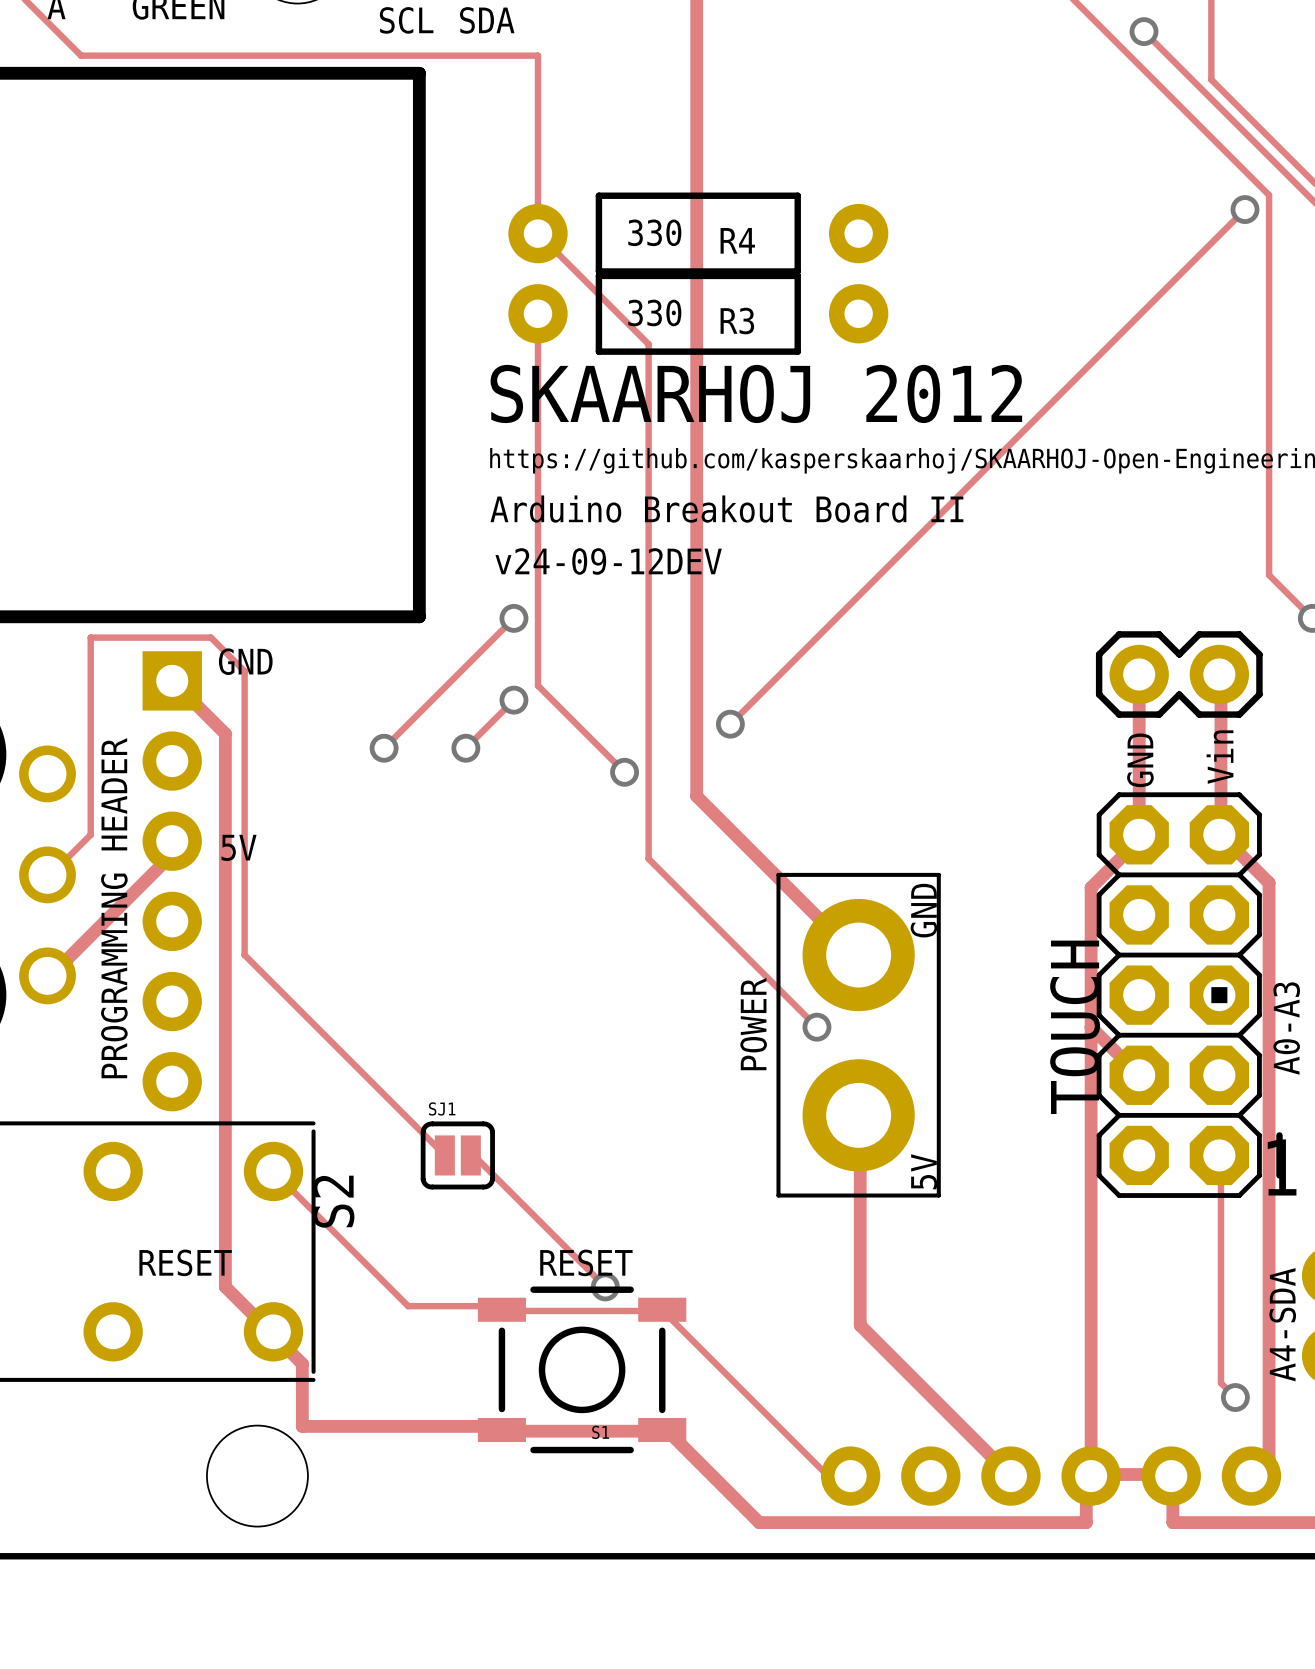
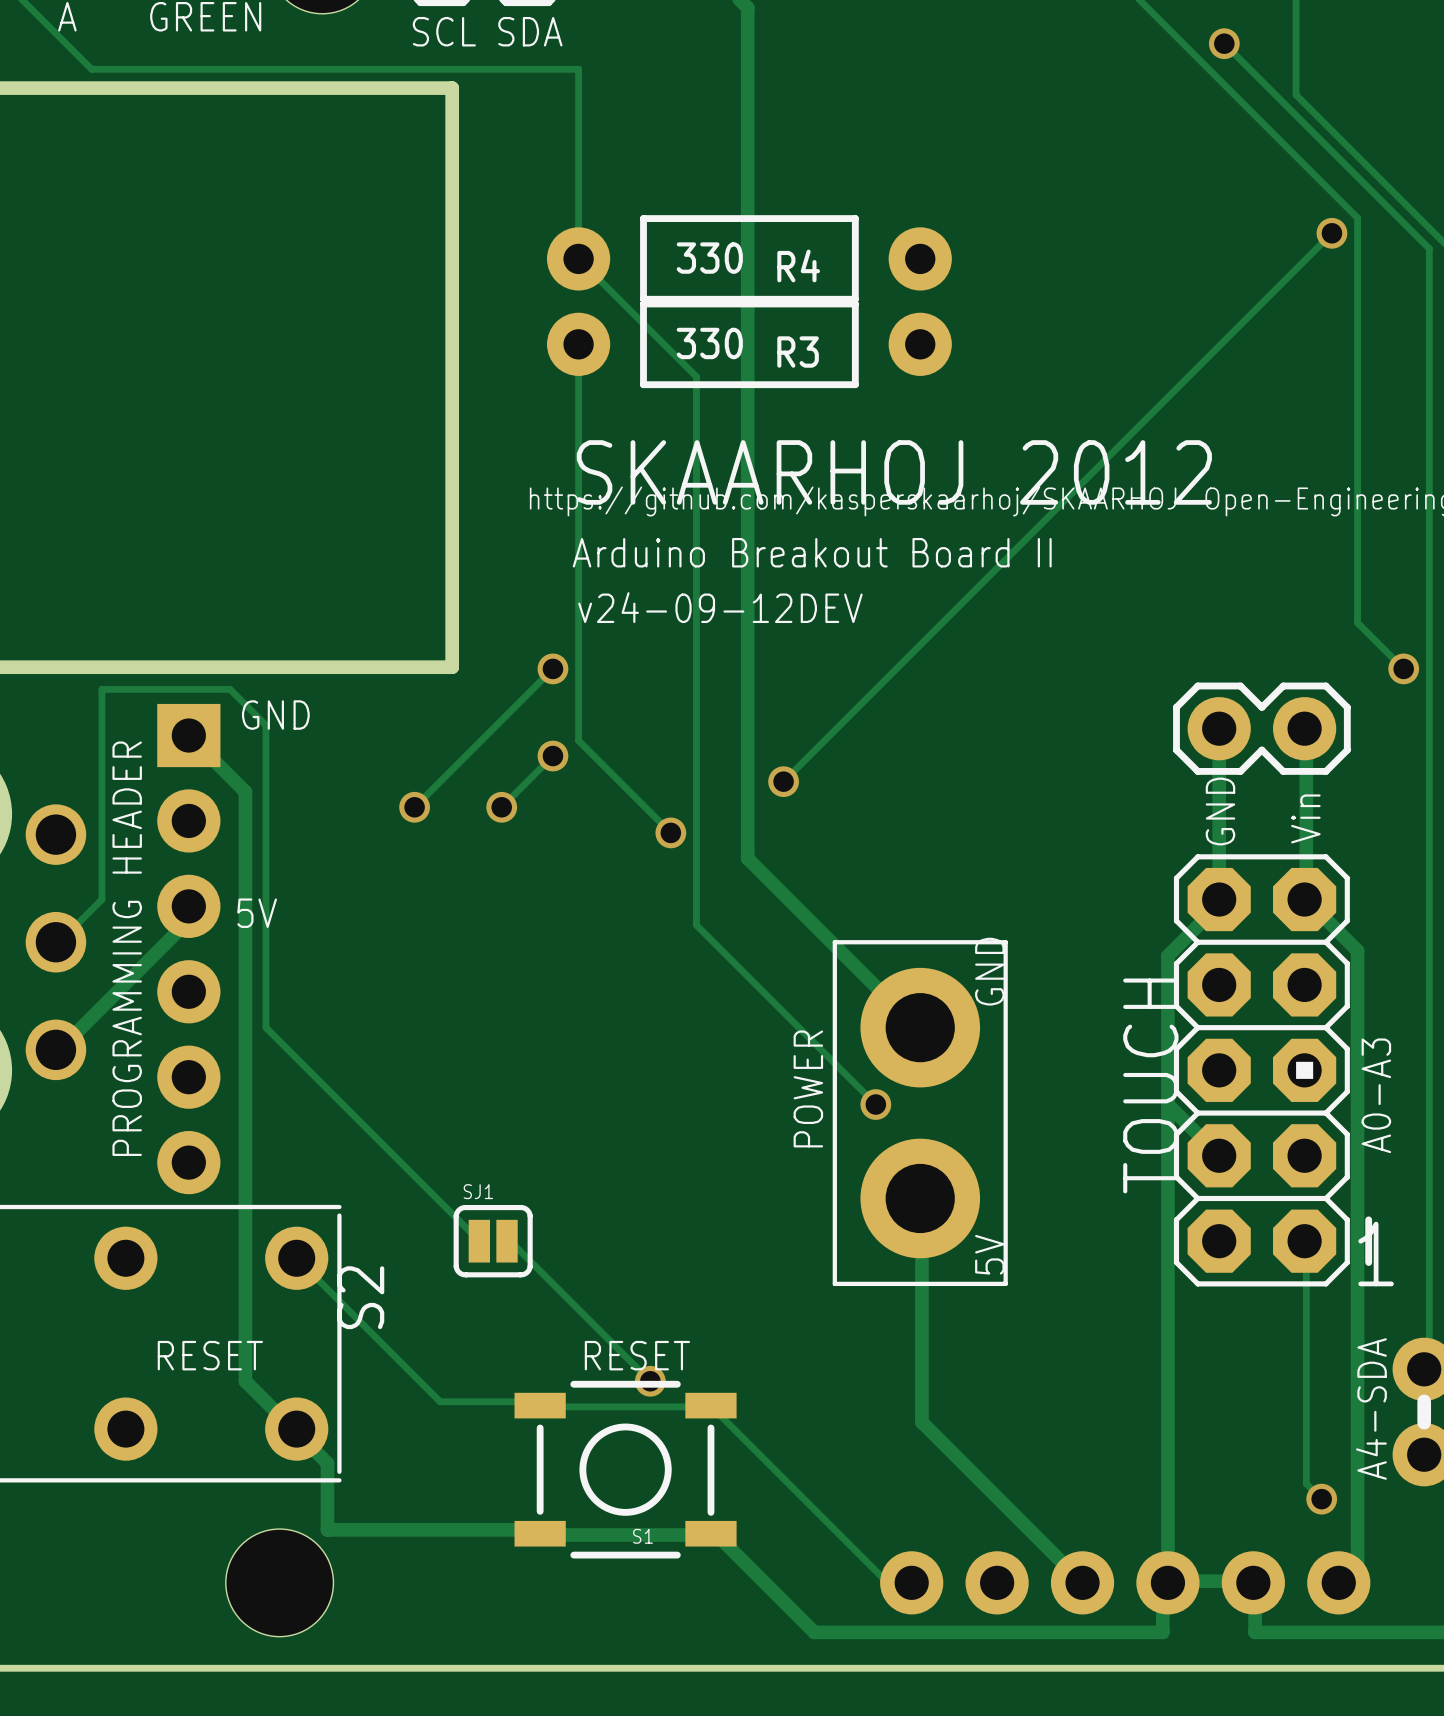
text position: SKAARHOJ 2012 (756, 393) -> SKAARHOJ 2012 (894, 472)
text position: Arduino Breakout Board II (726, 509) -> Arduino Breakout Board II (812, 552)
text position: v24-09-12DEV (608, 561) -> v24-09-12DEV (720, 607)

